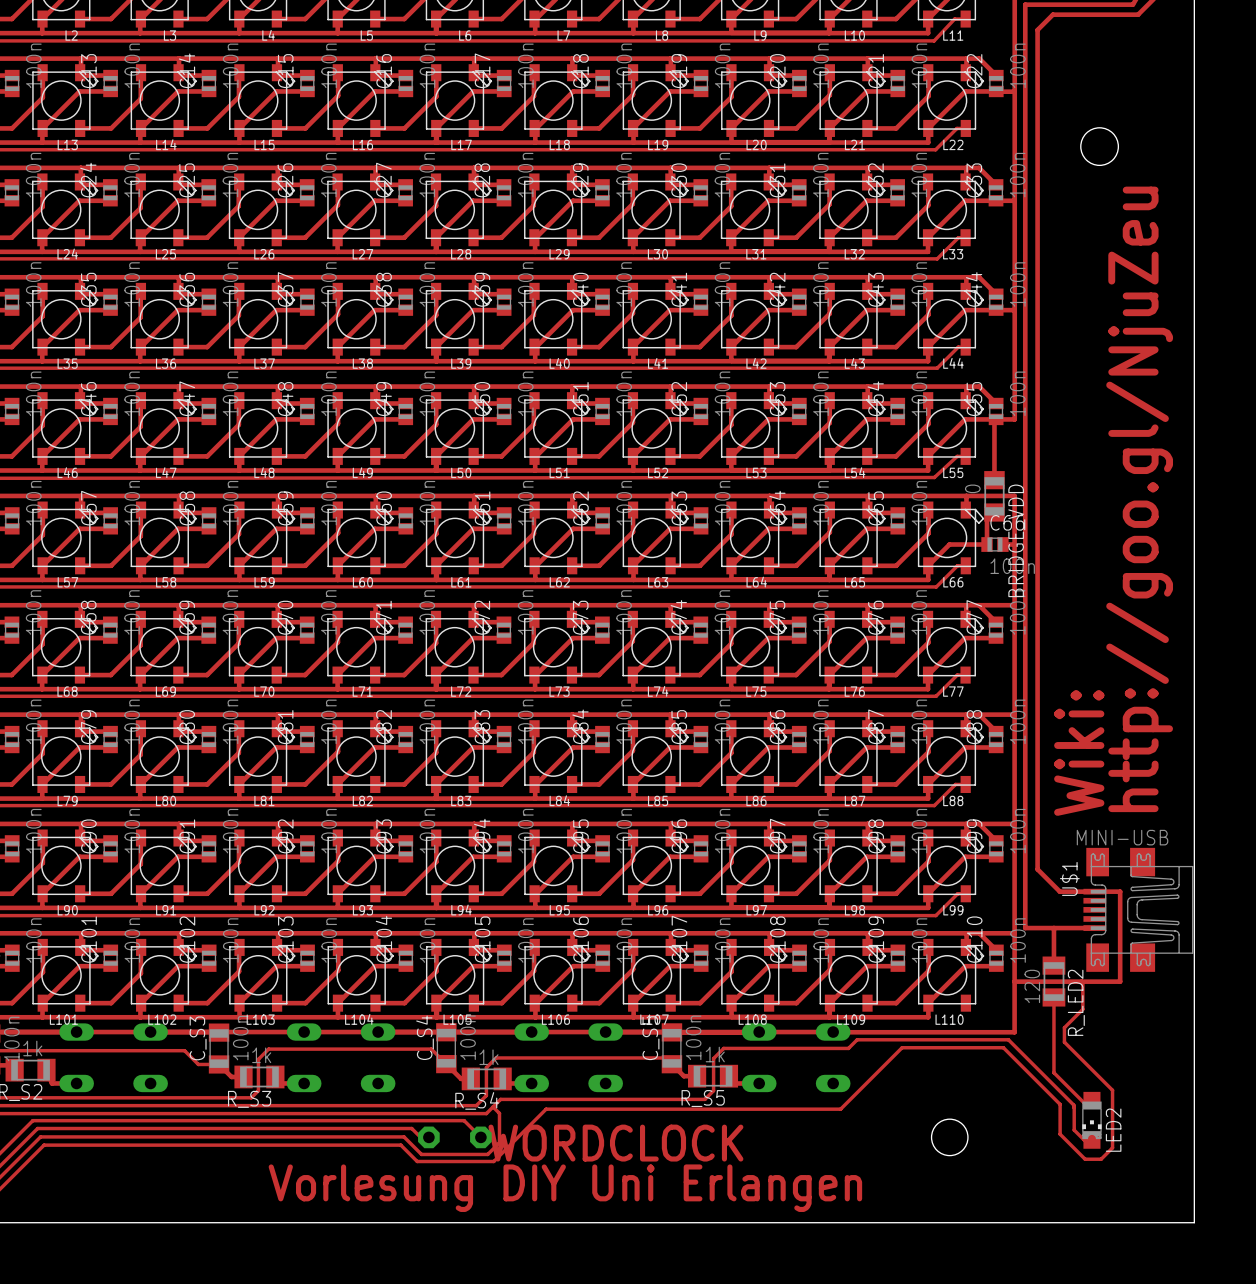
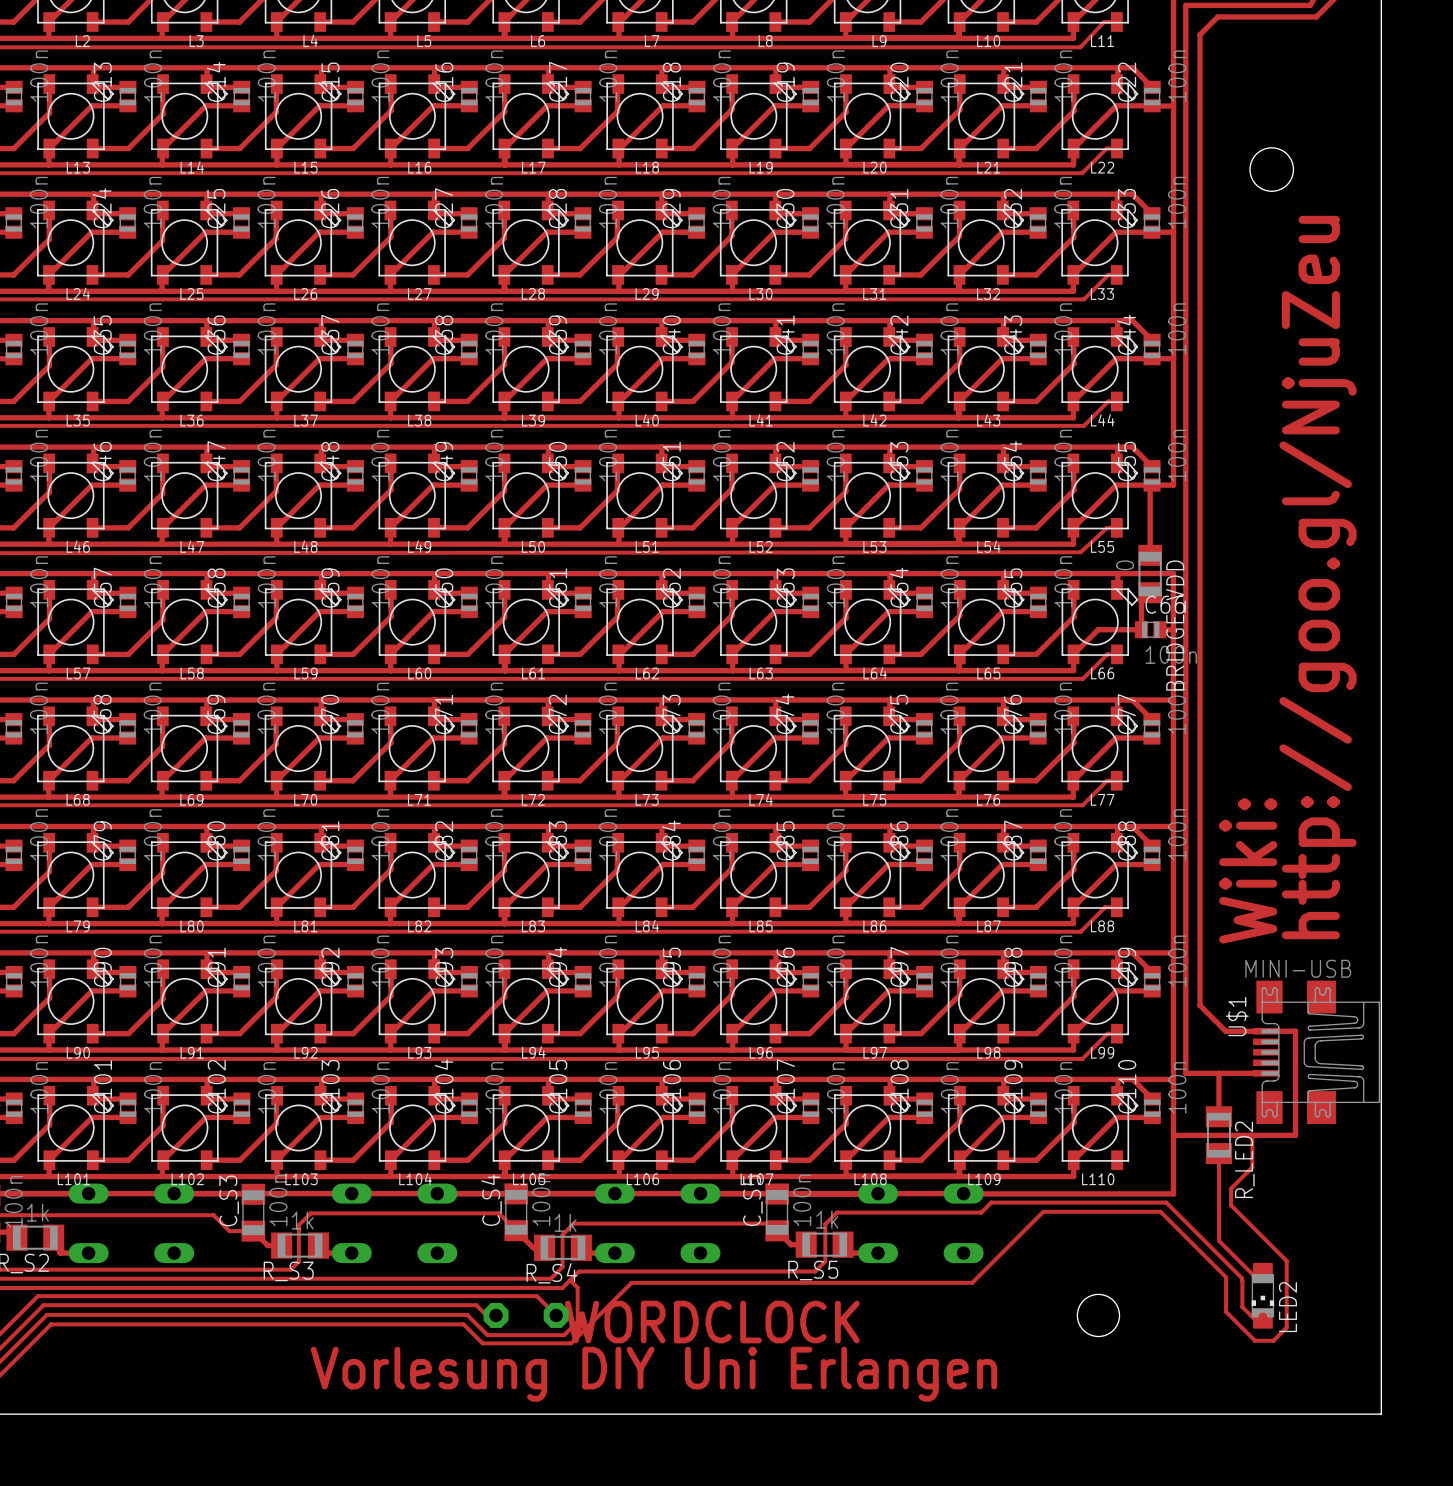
R_LED2 value: 120 (1032, 986) -> none

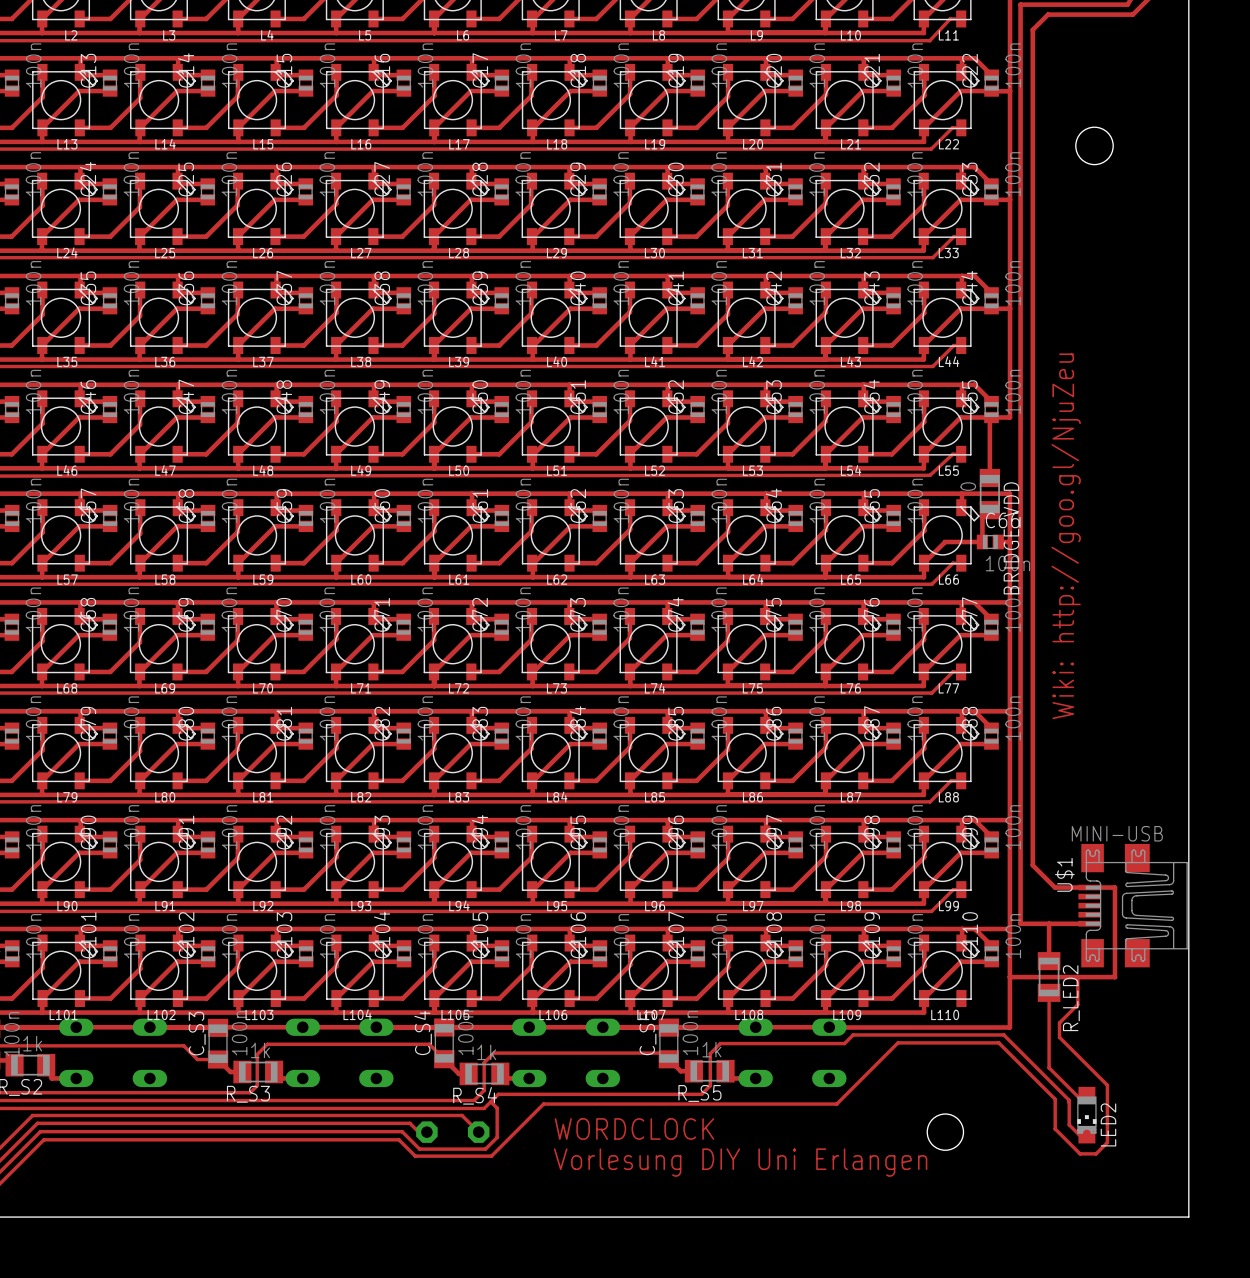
text: http://goo.gl/NjuZeu (1318, 577) -> Wiki: http://goo.gl/NjuZeu (1066, 536)
text: Wiki: (1248, 870) -> none
text: none -> WORDCLOCK (634, 1129)
text: WORDCLOCK (712, 1322) -> none
text: none -> Vorlesung DIY Uni Erlangen (740, 1162)
text: Vorlesung DIY Uni Erlangen (653, 1374) -> none

